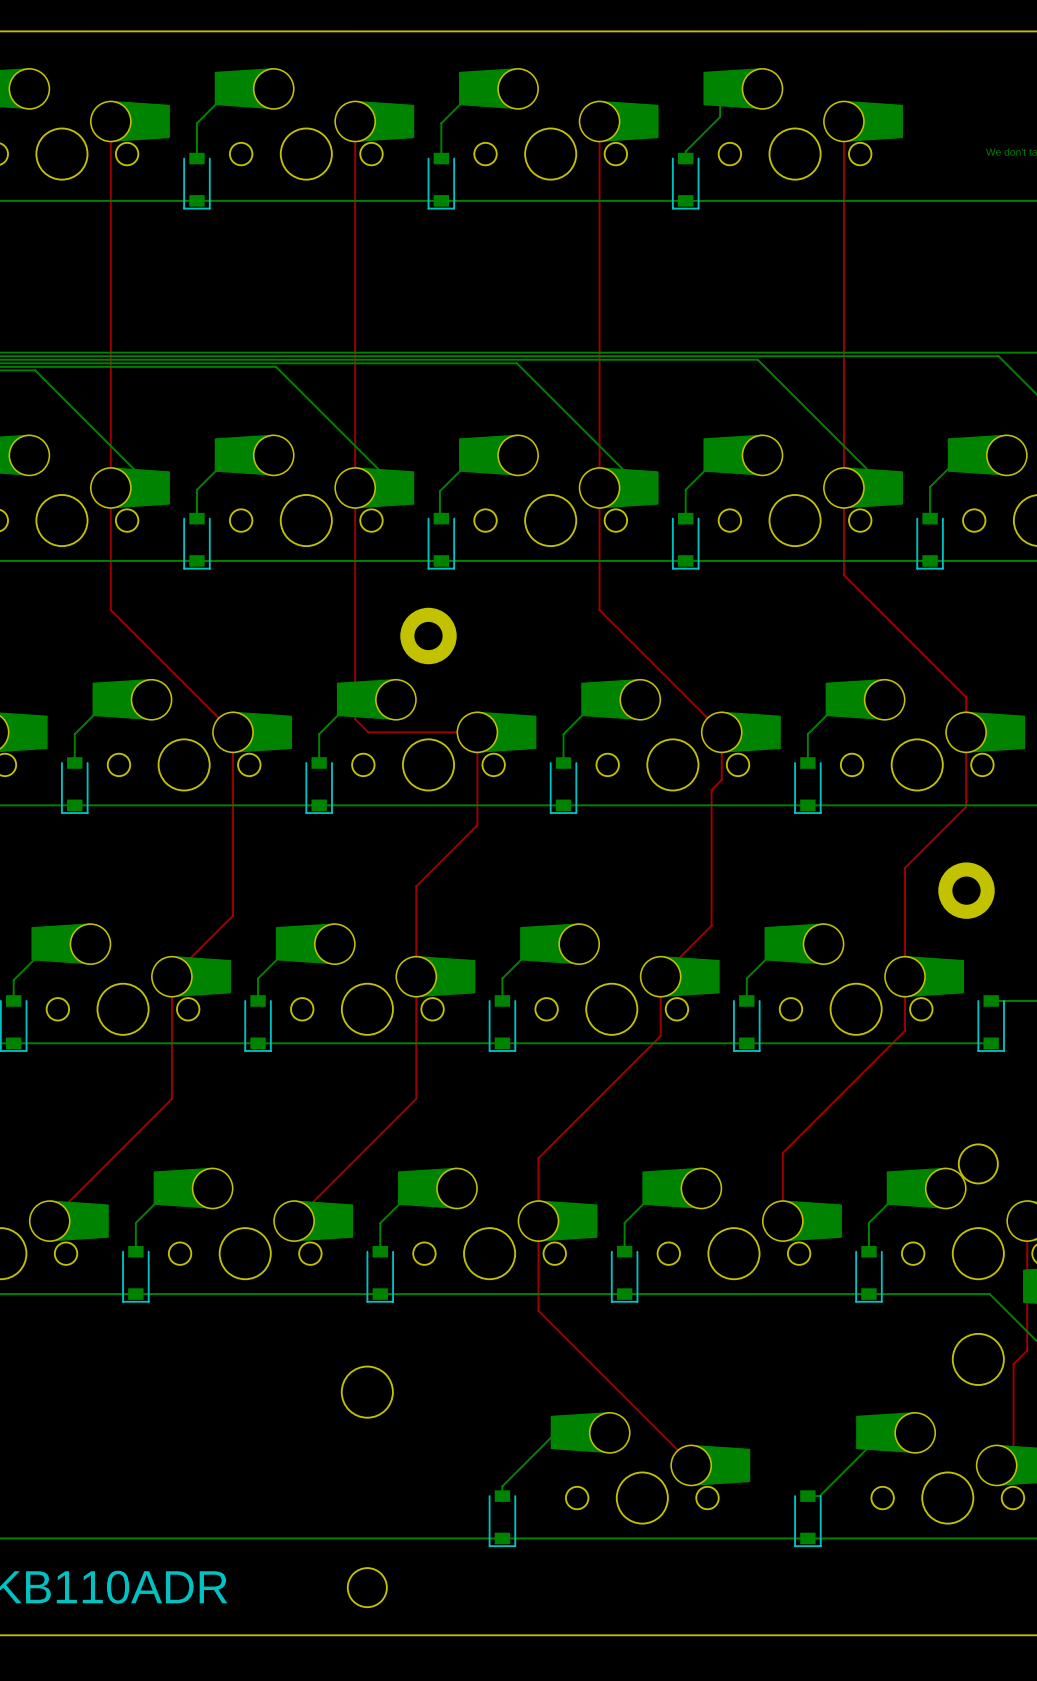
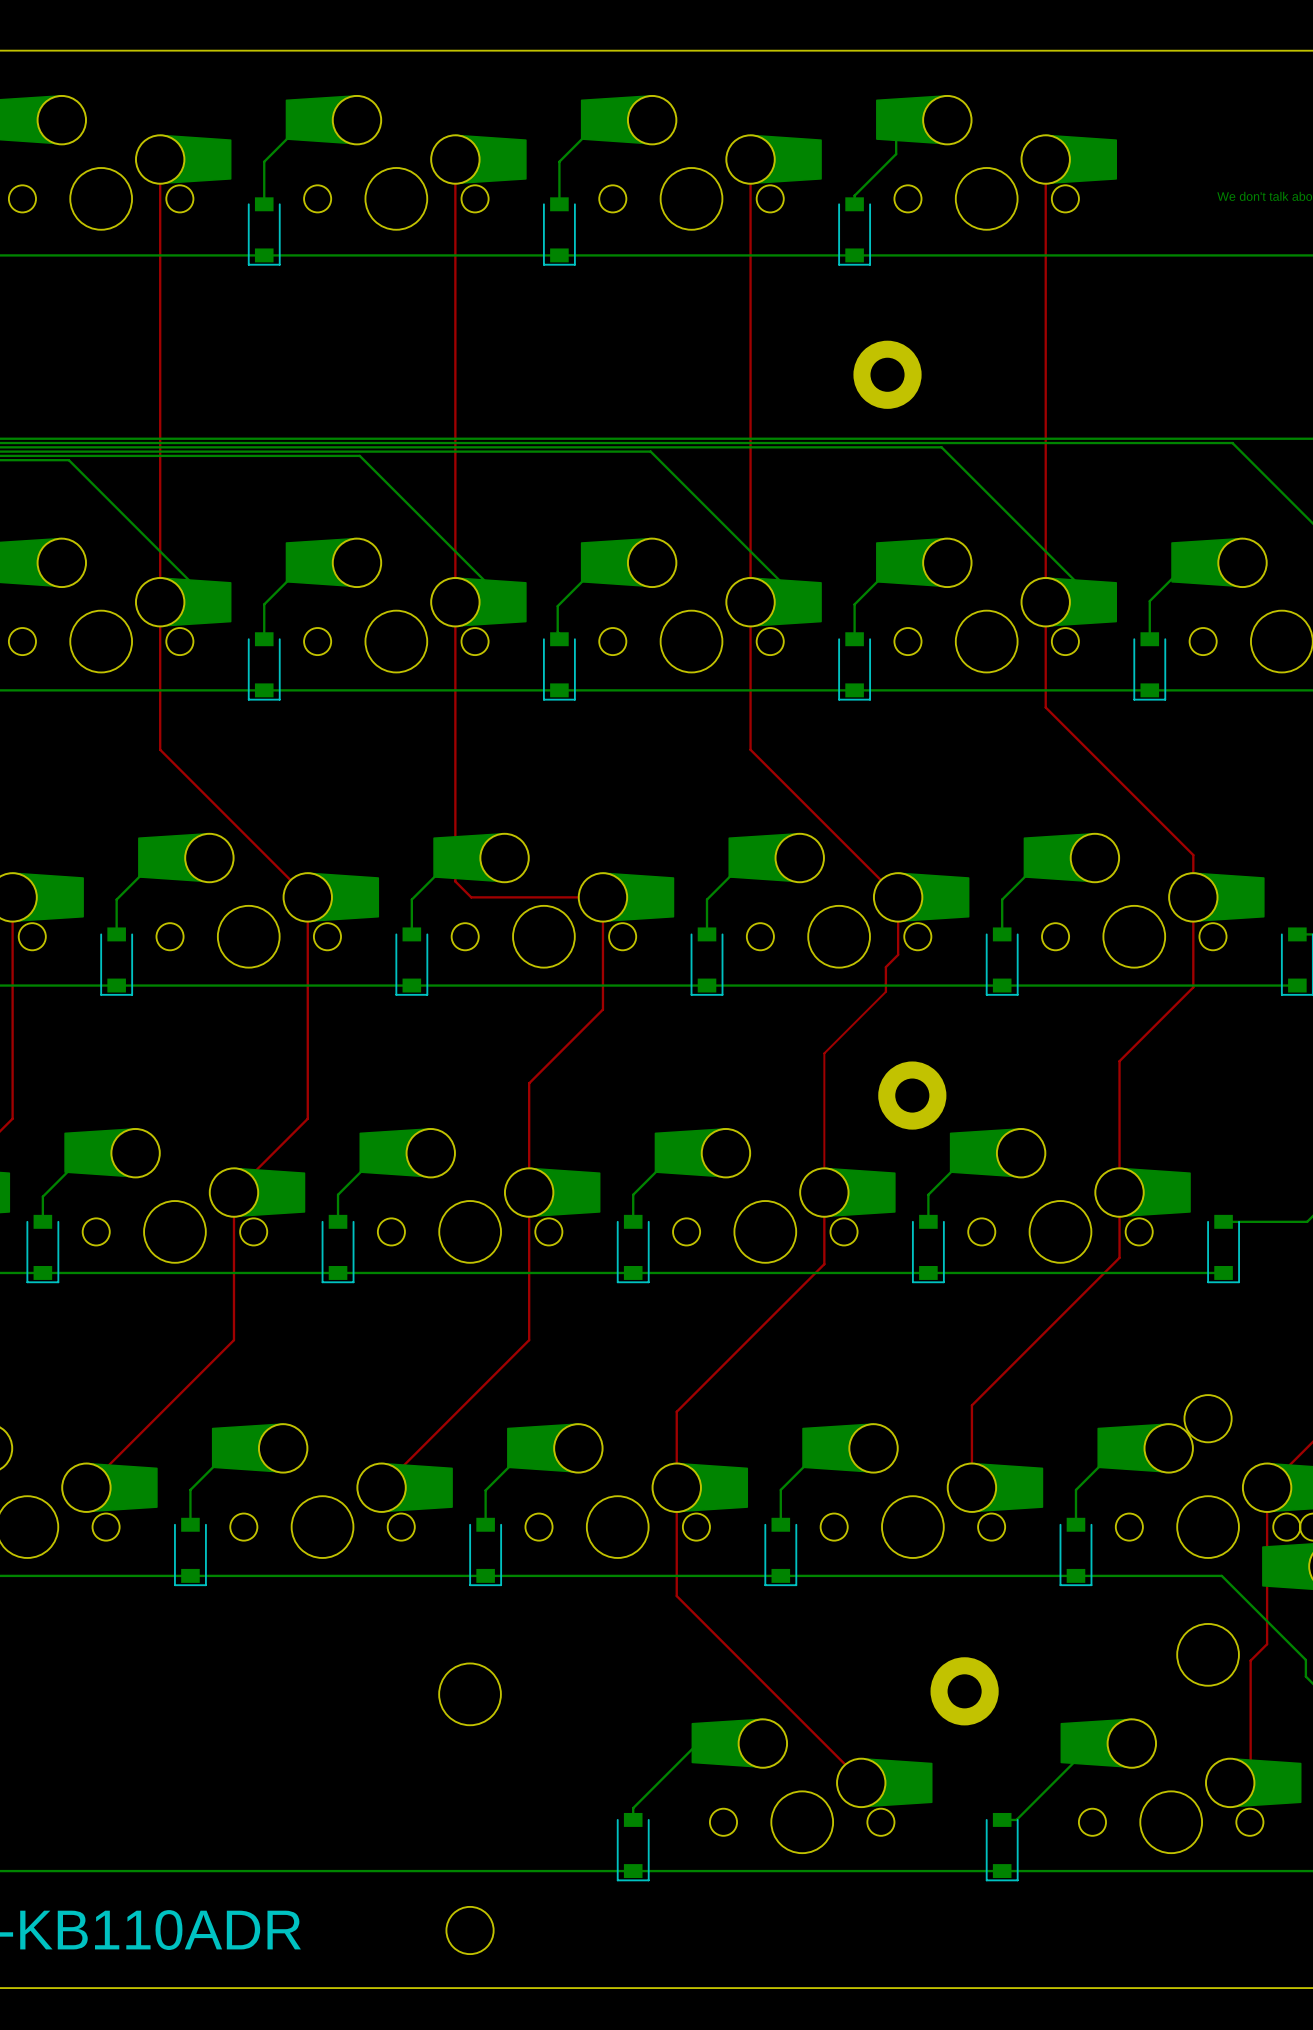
part: none -> (887, 374)
part: (428, 636) -> none
top track: (711, 810) (711, 925) (660, 976) -> (885, 991) (824, 1053) (824, 1192)
part: (966, 890) -> none
part: none -> (912, 1095)
part: none -> (964, 1691)

